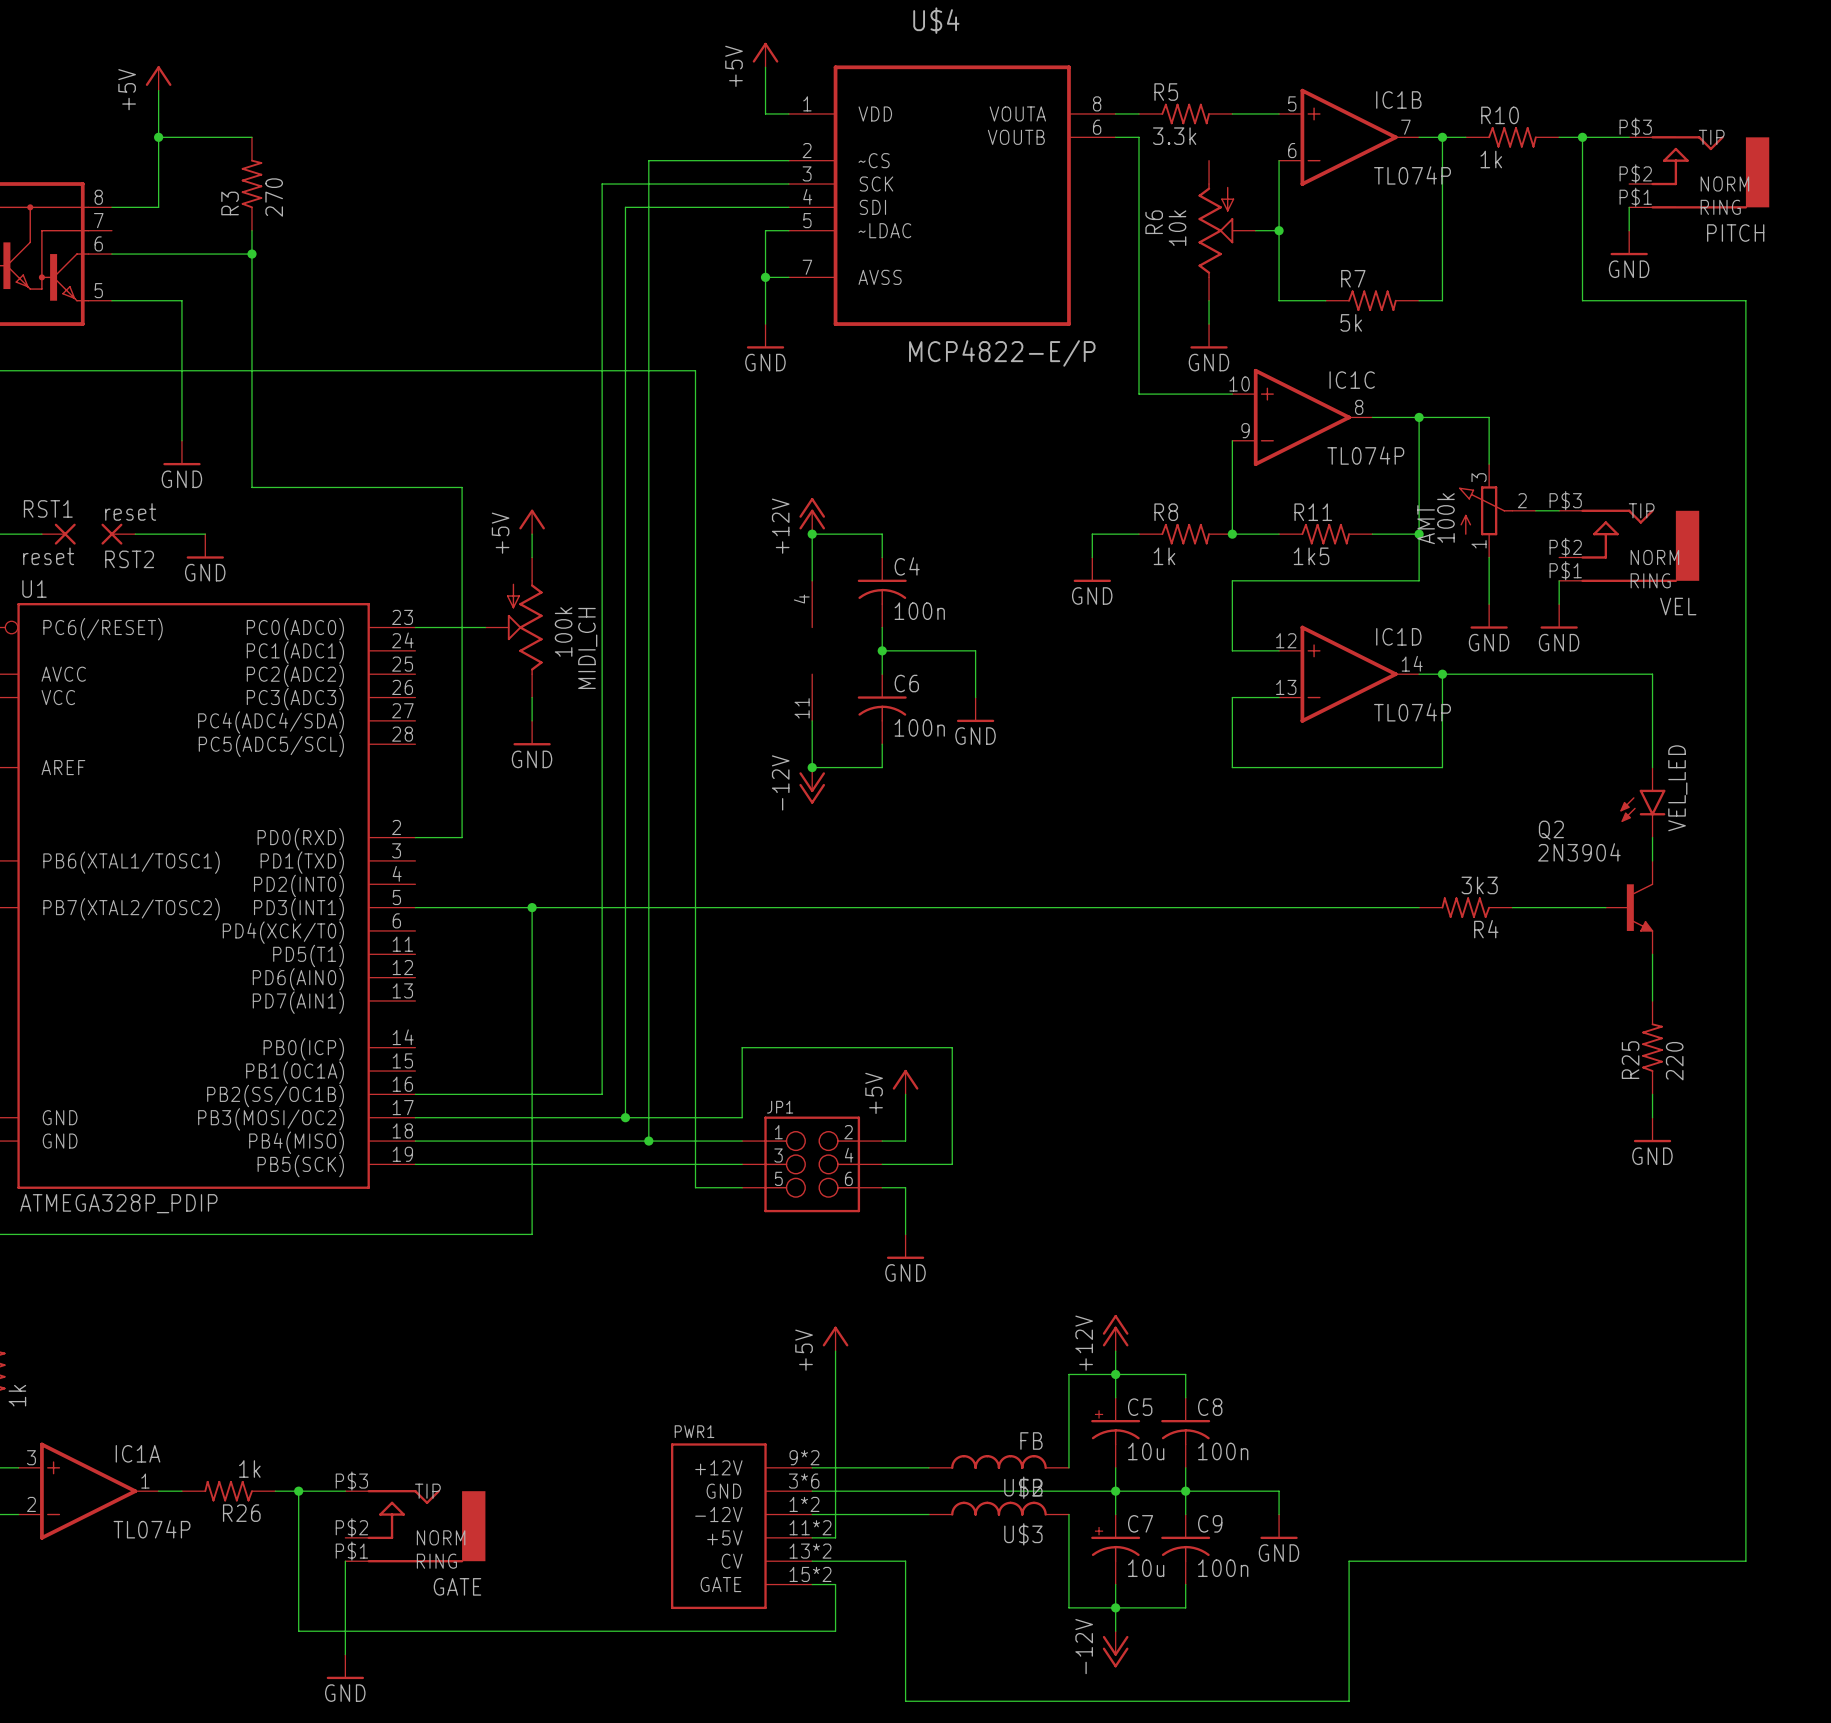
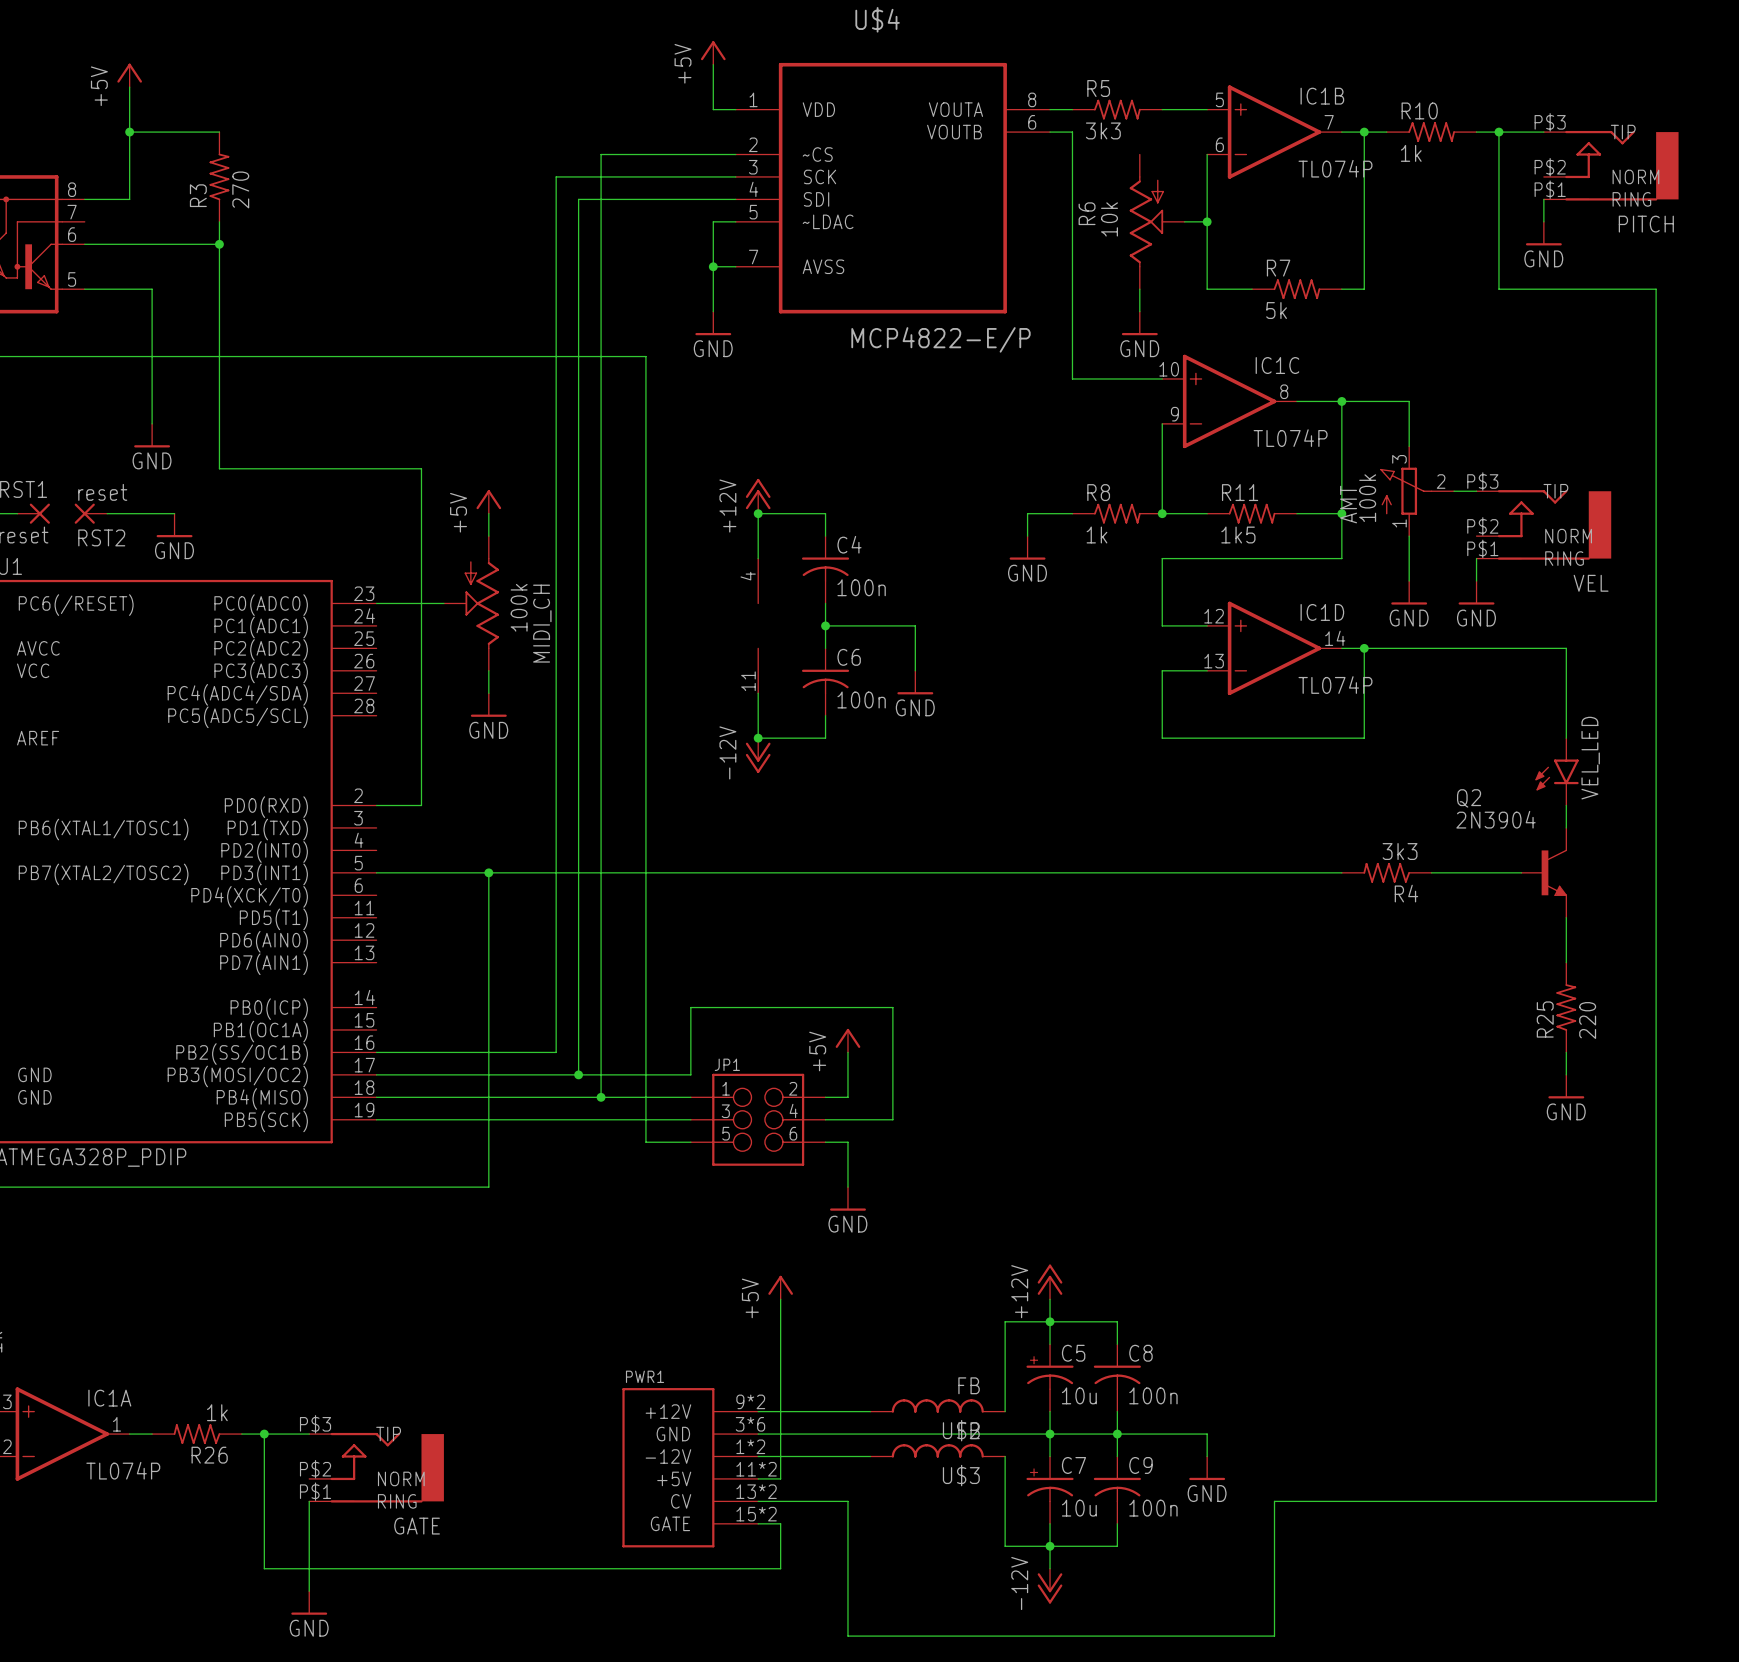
R5 value: 3.3k (1174, 136) -> 3k3 (1103, 130)

